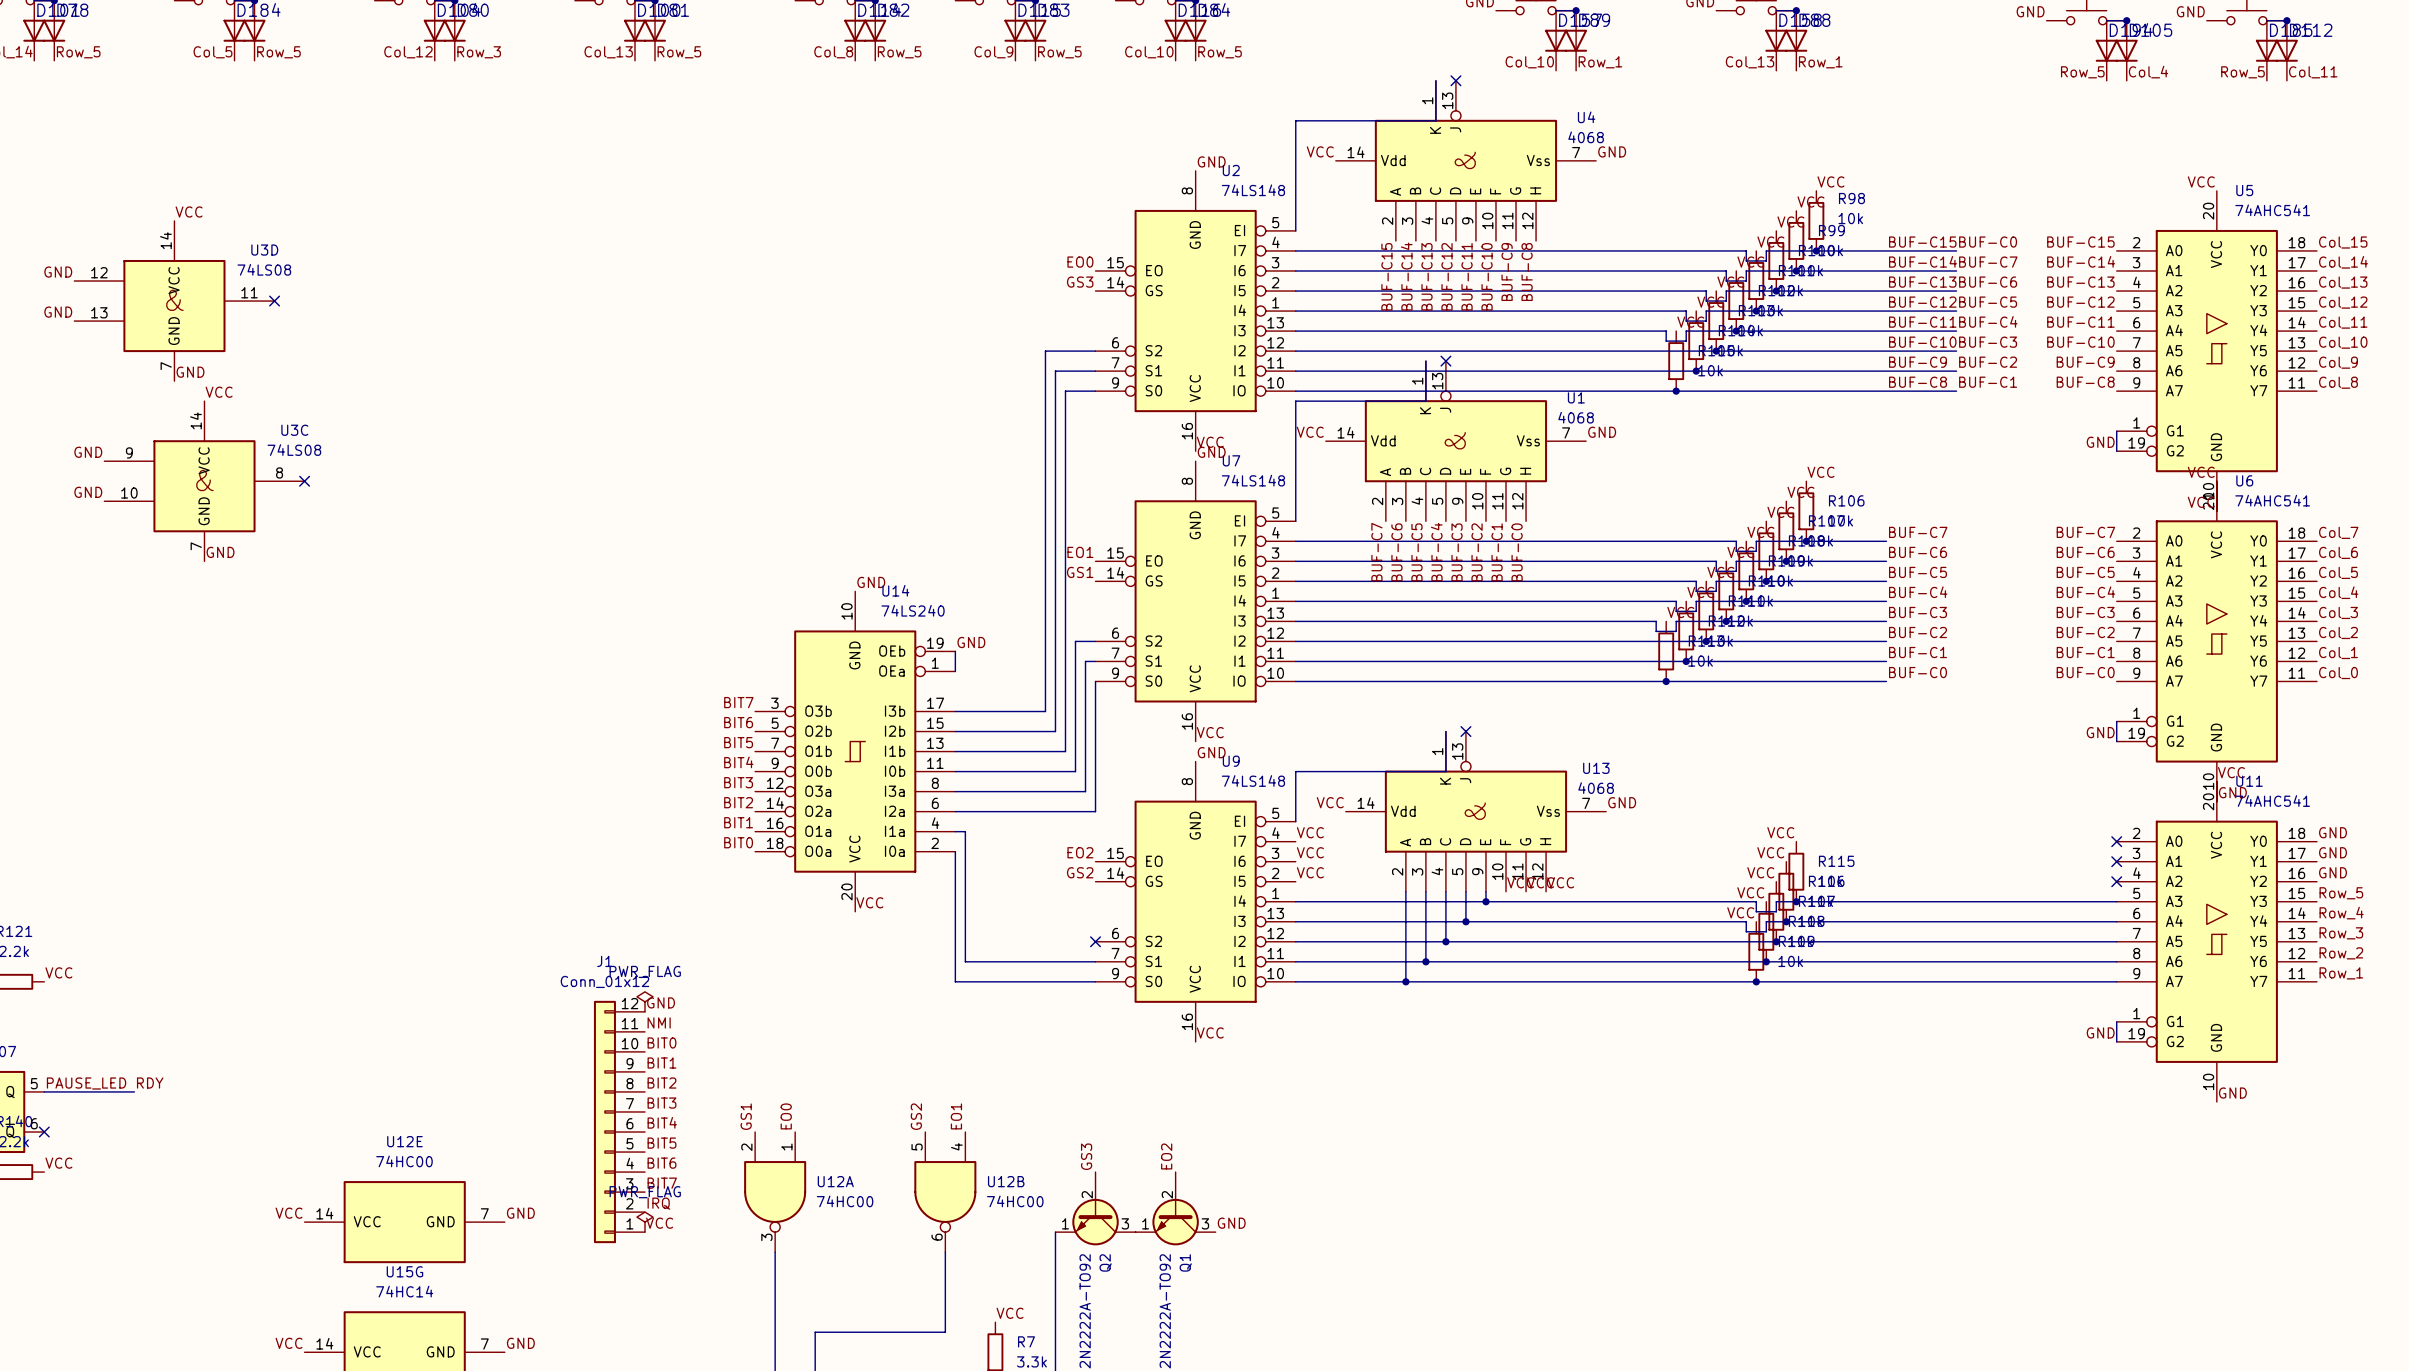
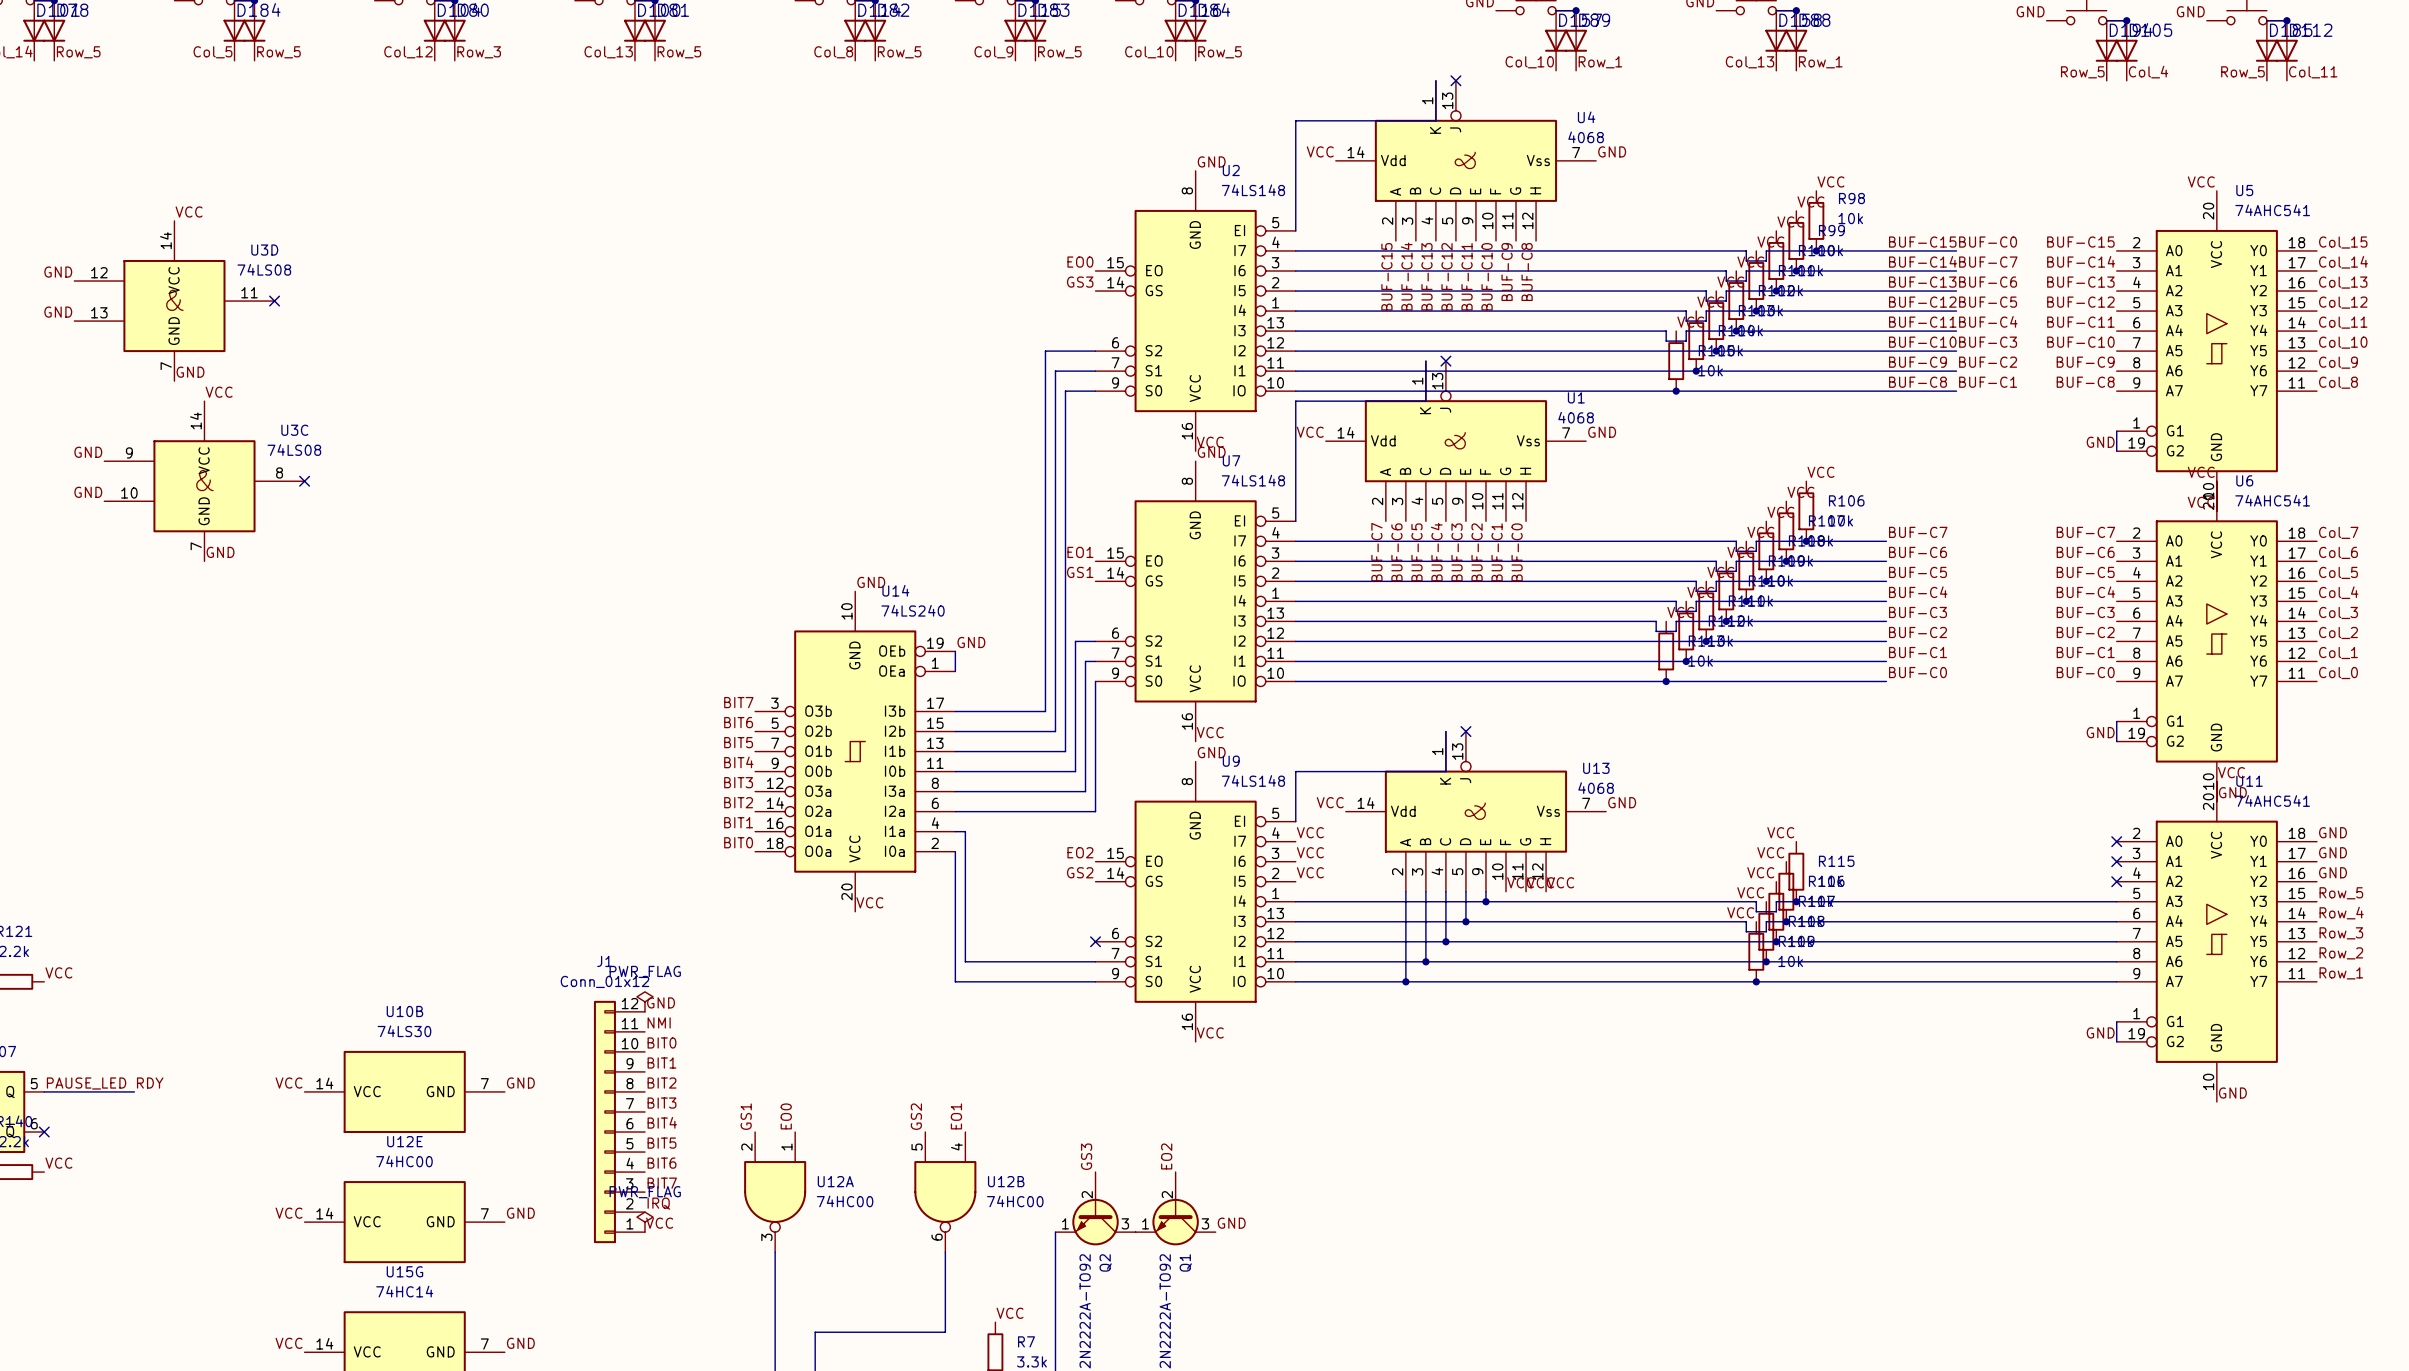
label: none -> VCC (289, 1083)
label: none -> GND (520, 1083)
U10B: none -> 74LS30 (404, 1091)

